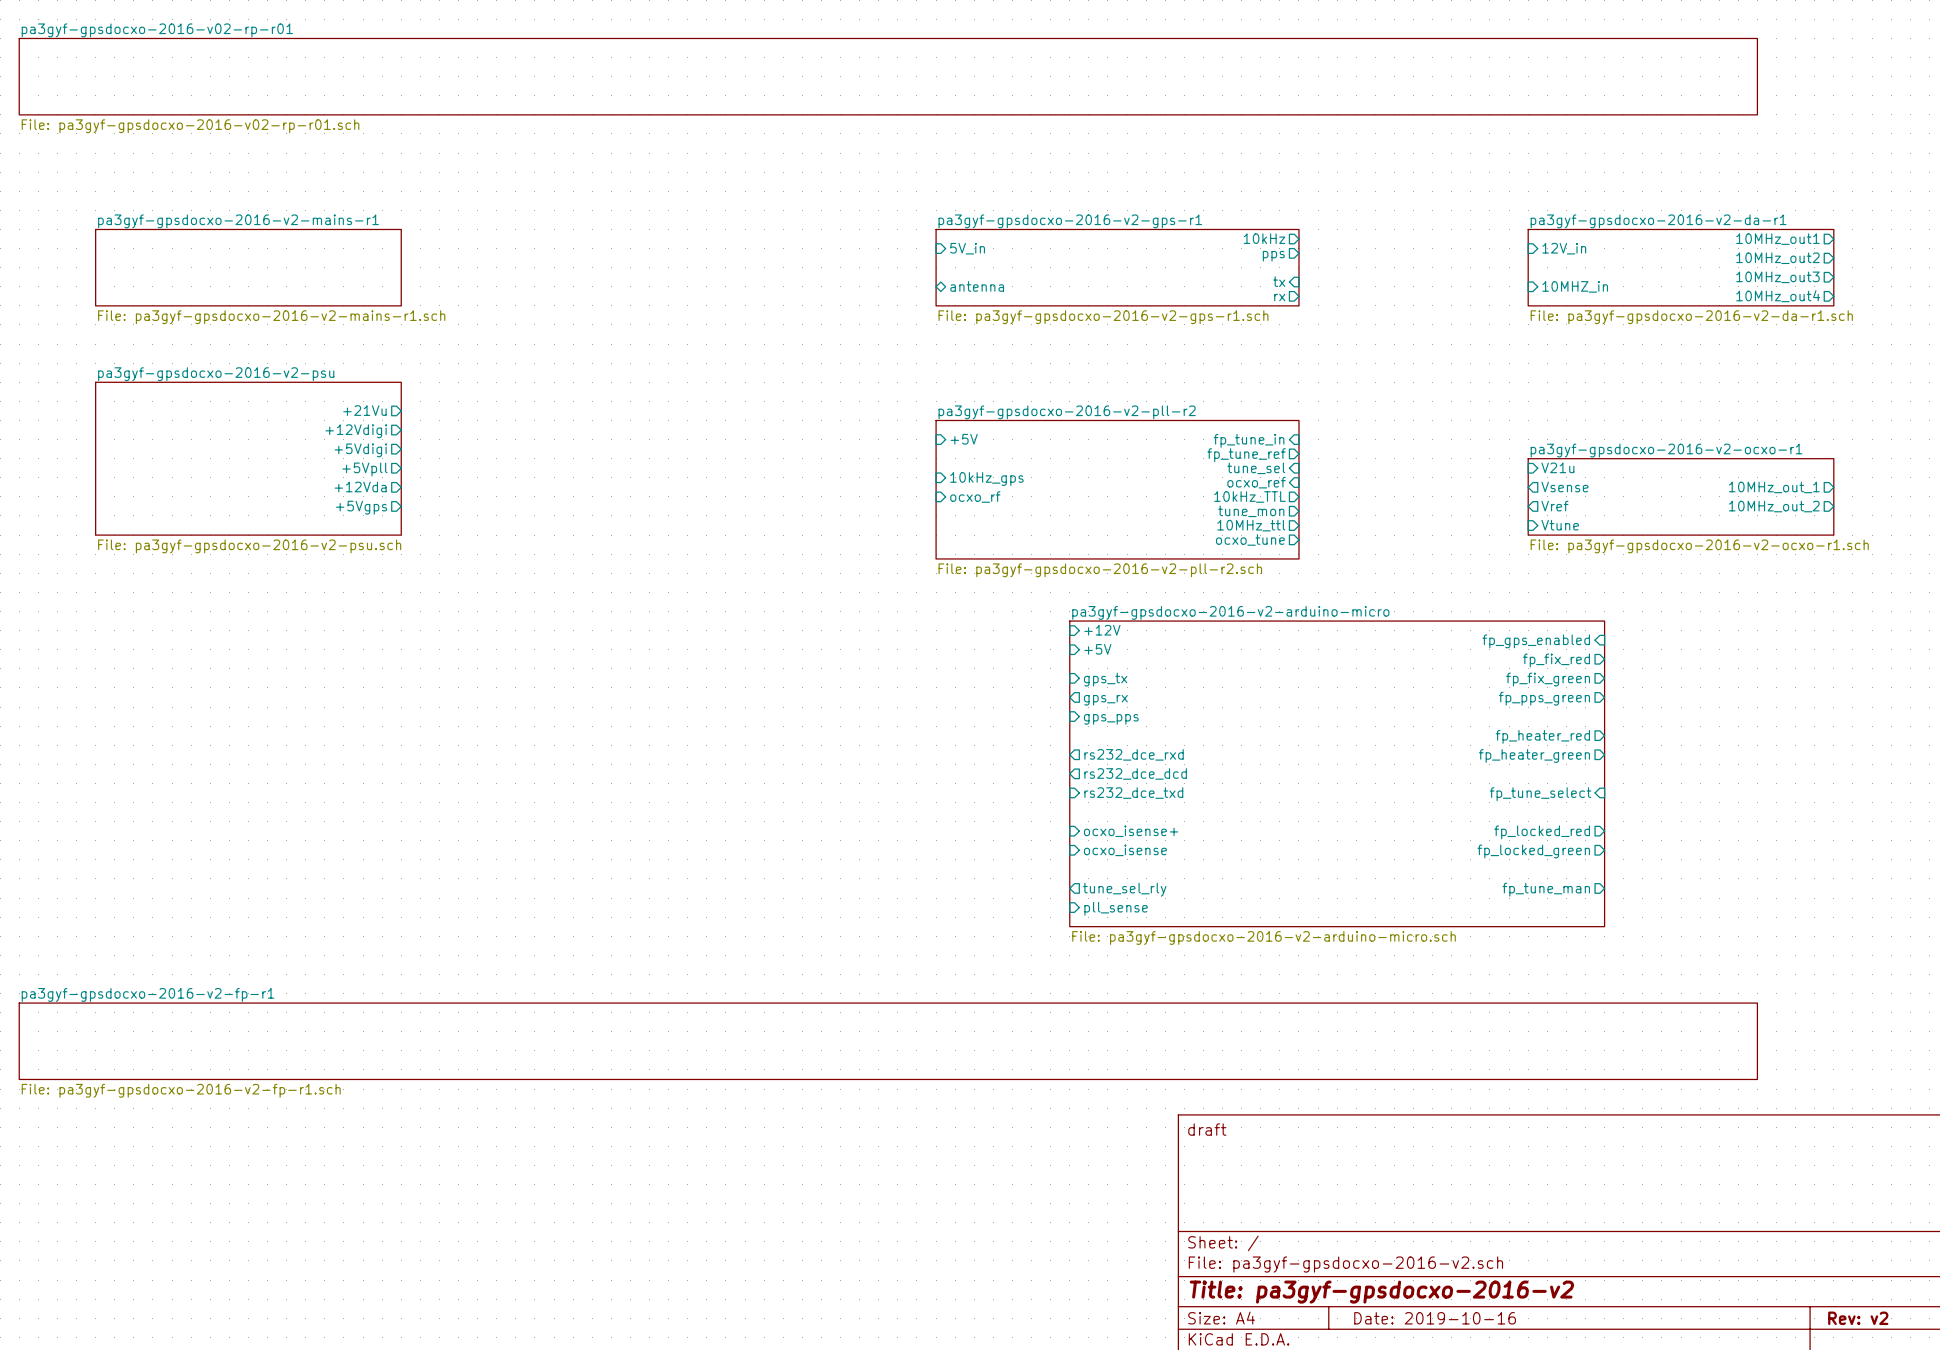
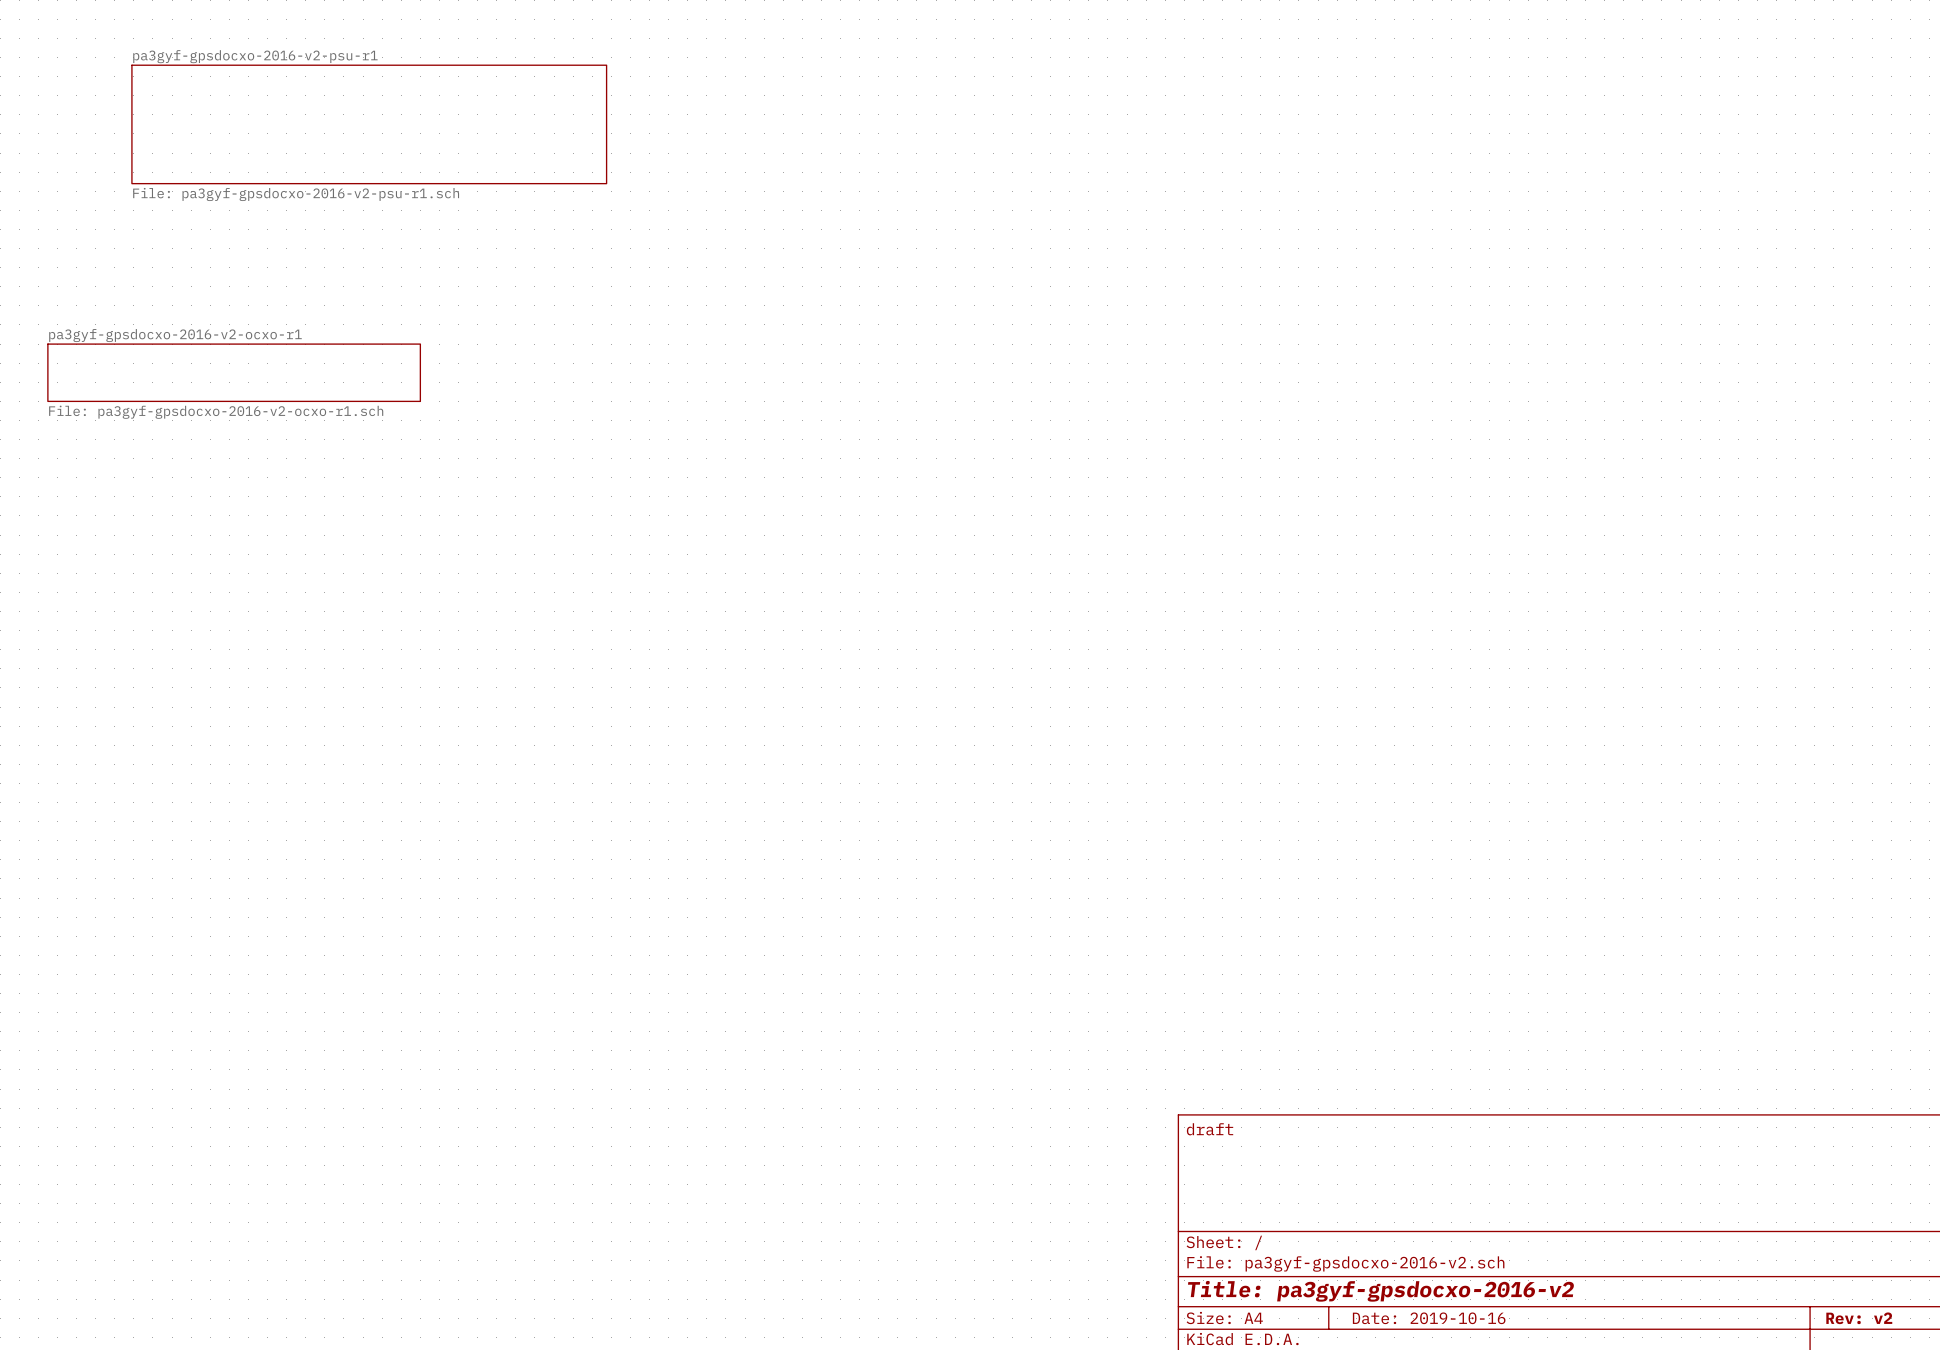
sheet pa3gyf-gpsdocxo-2016-v02-rp-r01: File: pa3gyf-gpsdocxo-2016-v02-rp-r01.sch (888, 76) -> none
sheet pa3gyf-gpsdocxo-2016-v2-psu-r1: none -> File: pa3gyf-gpsdocxo-2016-v2-psu-r1.sch (369, 124)
sheet pin: 10kHz (1264, 238) -> none
sheet pin: 10MHz_out1 (1777, 239) -> none
sheet pin: 5V_in (967, 248) -> none
sheet pin: 12V_in (1564, 248) -> none
sheet pin: pps (1273, 256) -> none
sheet pin: 10MHz_out2 (1777, 258) -> none
sheet pa3gyf-gpsdocxo-2016-v2-mains-r1: File: pa3gyf-gpsdocxo-2016-v2-mains-r1.sch (248, 267) -> none
sheet pa3gyf-gpsdocxo-2016-v2-gps-r1: File: pa3gyf-gpsdocxo-2016-v2-gps-r1.sch (1117, 267) -> none
sheet pa3gyf-gpsdocxo-2016-v2-da-r1: File: pa3gyf-gpsdocxo-2016-v2-da-r1.sch (1681, 267) -> none
sheet pin: 10MHz_out3 (1777, 277) -> none
sheet pin: tx (1279, 281) -> none
sheet pin: antenna (977, 286) -> none
sheet pin: 10MHZ_in (1575, 286) -> none
sheet pin: 10MHz_out4 (1778, 296) -> none
sheet pin: rx (1279, 297) -> none
sheet pin: +21Vu (364, 410) -> none
sheet pin: +12Vdigi (356, 431) -> none
sheet pin: +5V (964, 439) -> none
sheet pin: fp_tune_in (1249, 440) -> none
sheet pin: +5Vdigi (360, 450) -> none
sheet pa3gyf-gpsdocxo-2016-v2-ocxo-r1 name position: pa3gyf-gpsdocxo-2016-v2-ocxo-r1 (1666, 450) -> pa3gyf-gpsdocxo-2016-v2-ocxo-r1 (175, 335)
sheet pin: fp_tune_ref (1246, 455) -> none
sheet pa3gyf-gpsdocxo-2016-v2-psu: File: pa3gyf-gpsdocxo-2016-v2-psu.sch (248, 458) -> none
sheet pa3gyf-gpsdocxo-2016-v2-ocxo-r1 shape: [1528, 458, 1834, 536] -> [47, 344, 421, 402]
sheet pin: V21u (1557, 467) -> none
sheet pin: tune_sel (1256, 468) -> none
sheet pin: +5Vpll (364, 469) -> none
sheet pin: 10kHz_gps (986, 479) -> none
sheet pin: ocxo_ref (1256, 482) -> none
sheet pin: +12Vda (360, 486) -> none
sheet pin: Vsense (1564, 486) -> none
sheet pin: 10MHz_out_1 (1774, 487) -> none
sheet pa3gyf-gpsdocxo-2016-v2-pll-r2: File: pa3gyf-gpsdocxo-2016-v2-pll-r2.sch (1117, 489) -> none
sheet pin: ocxo_rf (975, 496) -> none
sheet pin: 10kHz_TTL (1249, 496) -> none
sheet pin: Vref (1554, 506) -> none
sheet pin: 10MHz_out_2 (1774, 506) -> none
sheet pin: +5Vgps (361, 507) -> none
sheet pin: tune_mon (1251, 511) -> none
sheet pin: 10MHz_ttl (1251, 525) -> none
sheet pin: Vtune (1560, 525) -> none
sheet pin: ocxo_tune (1250, 539) -> none
sheet pa3gyf-gpsdocxo-2016-v2-ocxo-r1 value position: File: pa3gyf-gpsdocxo-2016-v2-ocxo-r1.sch (1699, 546) -> File: pa3gyf-gpsdocxo-2016-v2-ocxo-r1.sch (216, 412)
sheet pin: +12V (1102, 630) -> none
sheet pin: fp_gps_enabled (1536, 641) -> none
sheet pin: +5V (1097, 649) -> none
sheet pin: fp_fix_red (1556, 660) -> none
sheet pin: gps_tx (1105, 679) -> none
sheet pin: fp_fix_green (1548, 679) -> none
sheet pin: fp_pps_green (1544, 698) -> none
sheet pin: gps_rx (1105, 700) -> none
sheet pin: gps_pps (1111, 719) -> none
sheet pin: fp_heater_red (1542, 736) -> none
sheet pin: rs232_dce_rxd (1134, 754) -> none
sheet pin: fp_heater_green (1534, 755) -> none
sheet pin: rs232_dce_dcd (1135, 773) -> none
sheet pa3gyf-gpsdocxo-2016-v2-arduino-micro: File: pa3gyf-gpsdocxo-2016-v2-arduino-micro.sch (1337, 773) -> none
sheet pin: rs232_dce_txd (1133, 793) -> none
sheet pin: fp_tune_select (1540, 794) -> none
sheet pin: ocxo_isense+ (1131, 831) -> none
sheet pin: fp_locked_red (1542, 832) -> none
sheet pin: ocxo_isense (1125, 850) -> none
sheet pin: fp_locked_green (1533, 851) -> none
sheet pin: tune_sel_rly (1124, 889) -> none
sheet pin: fp_tune_man (1546, 889) -> none
sheet pin: pll_sense (1116, 908) -> none
sheet pa3gyf-gpsdocxo-2016-v2-fp-r1: File: pa3gyf-gpsdocxo-2016-v2-fp-r1.sch (888, 1041) -> none

